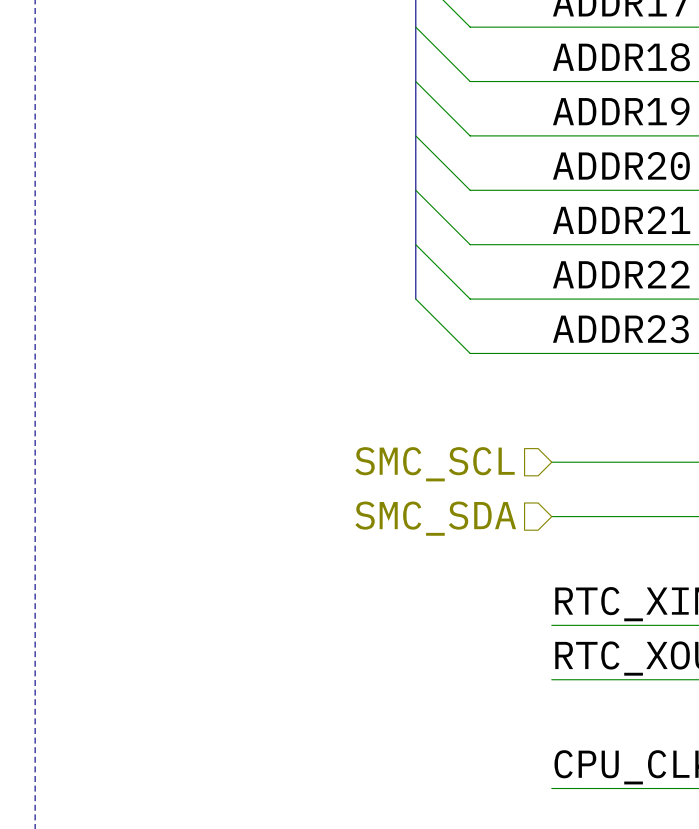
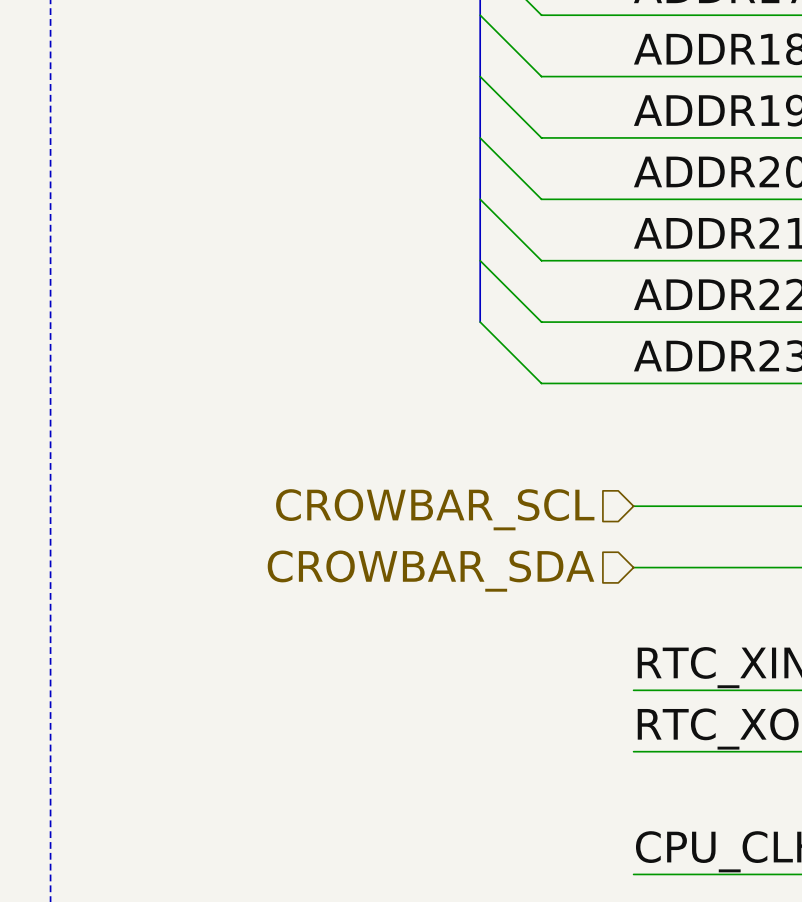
hierarchical label: SMC_SCL (435, 464) -> CROWBAR_SCL (435, 509)
hierarchical label: SMC_SDA (435, 518) -> CROWBAR_SDA (431, 571)

